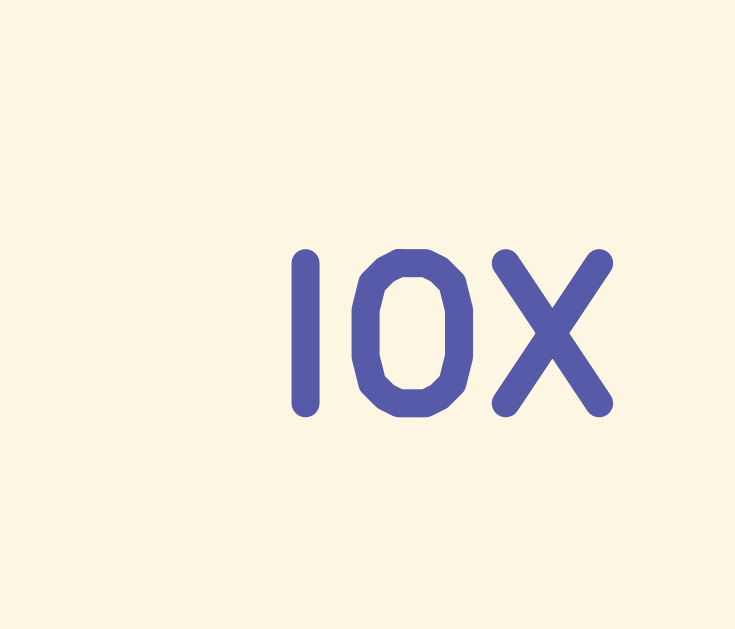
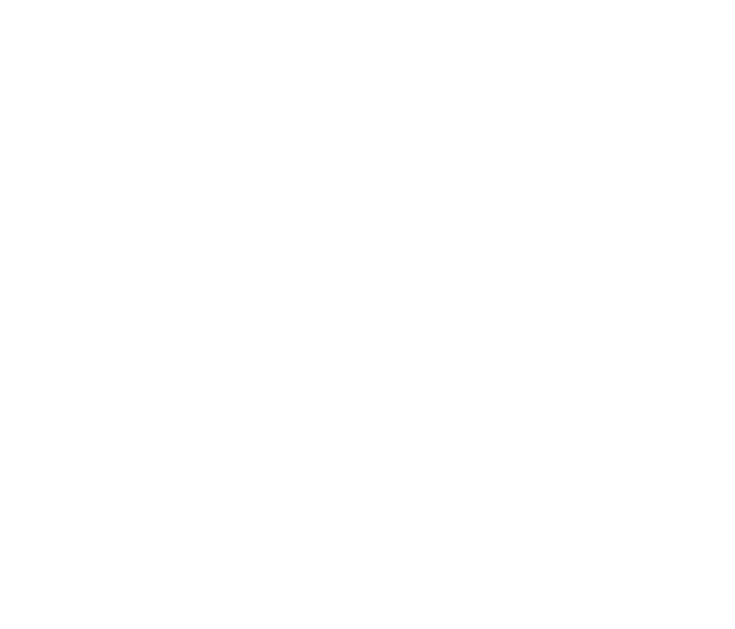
text: IOX (452, 333) -> none

